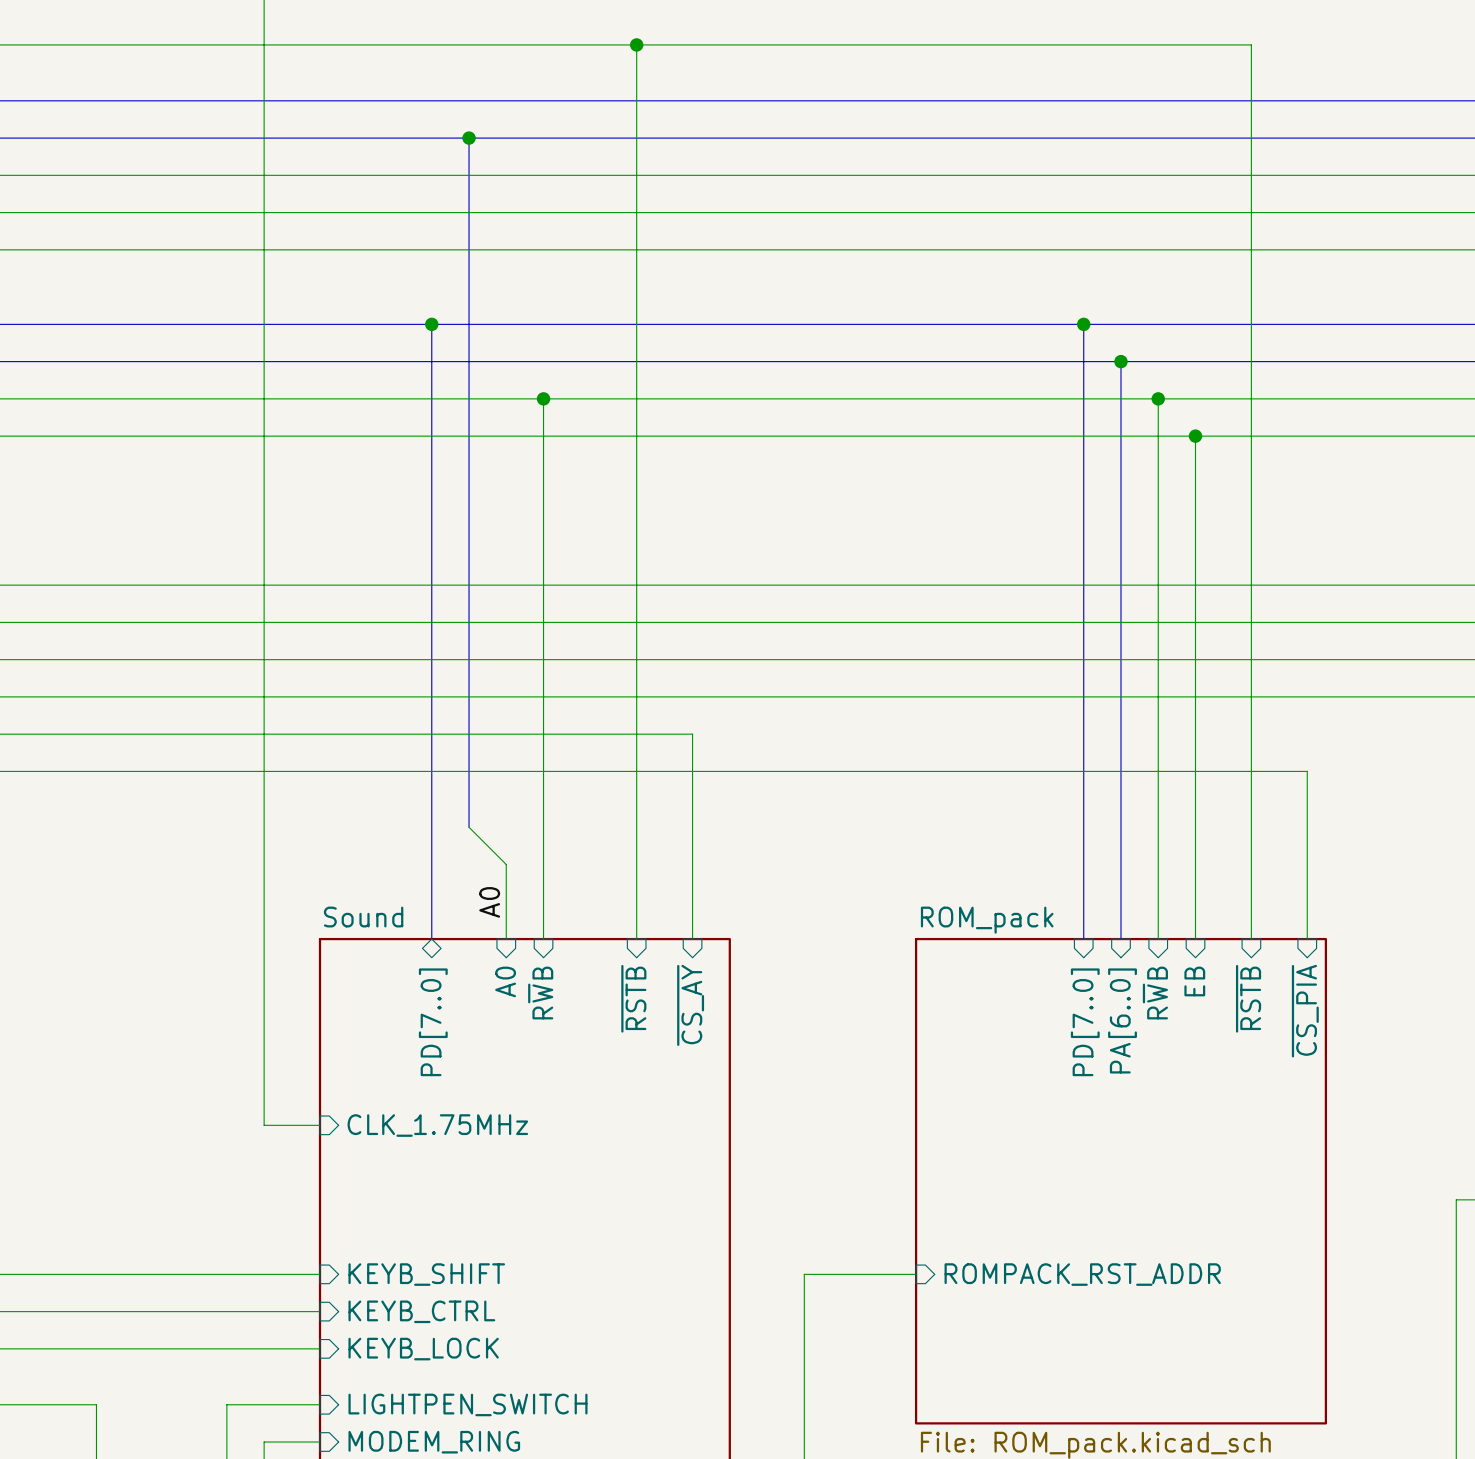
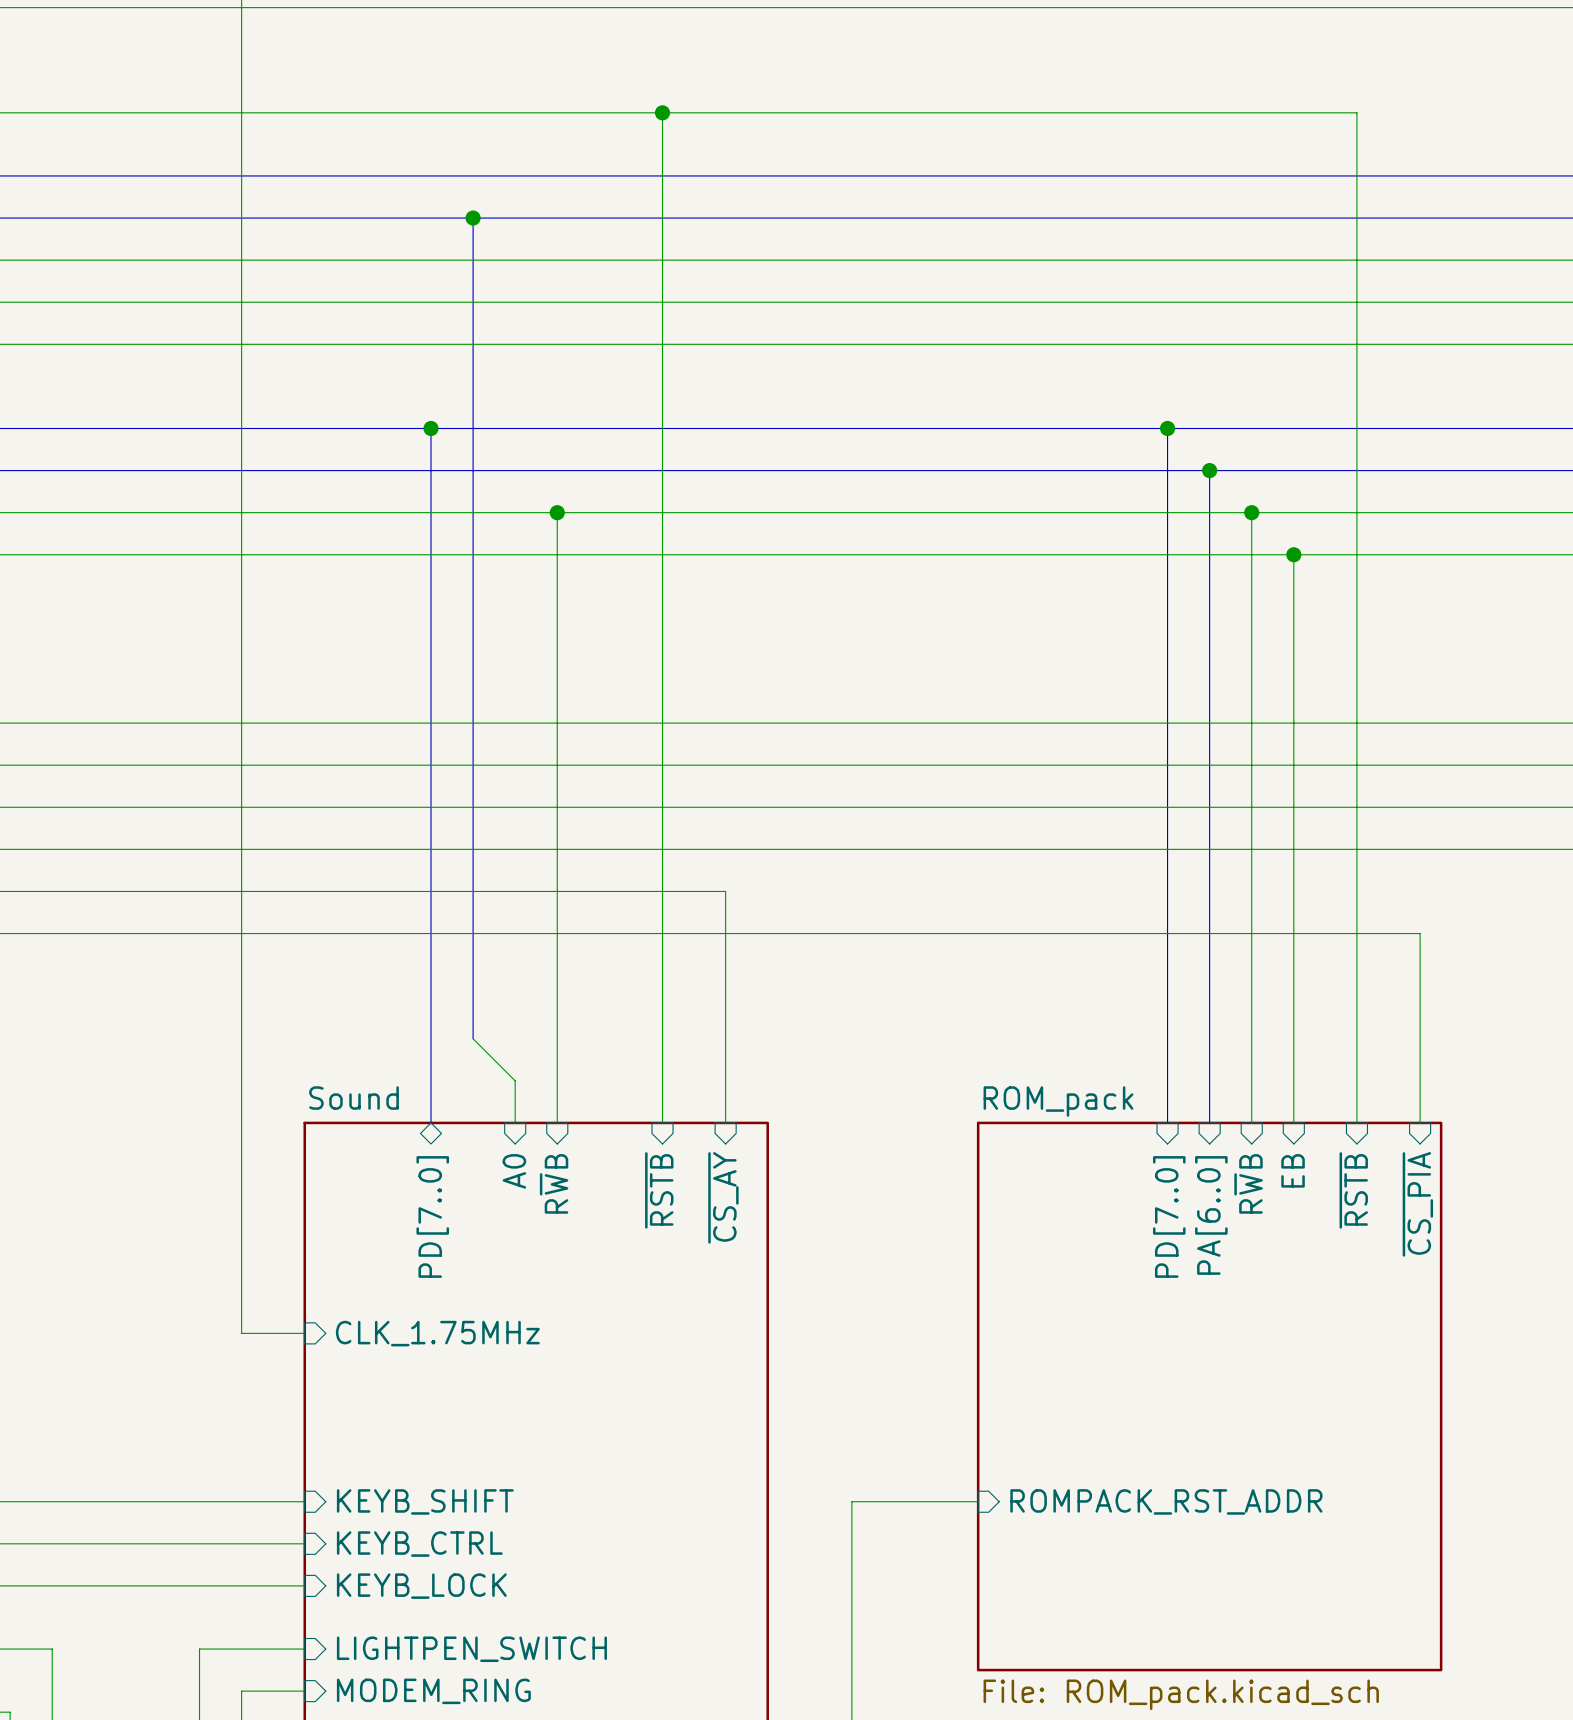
wire: (469, 827) (506, 864) (506, 901) -> (473, 1038) (515, 1080)
bus: none -> (473, 996) (473, 1038)
label: A0 (489, 902) -> none

